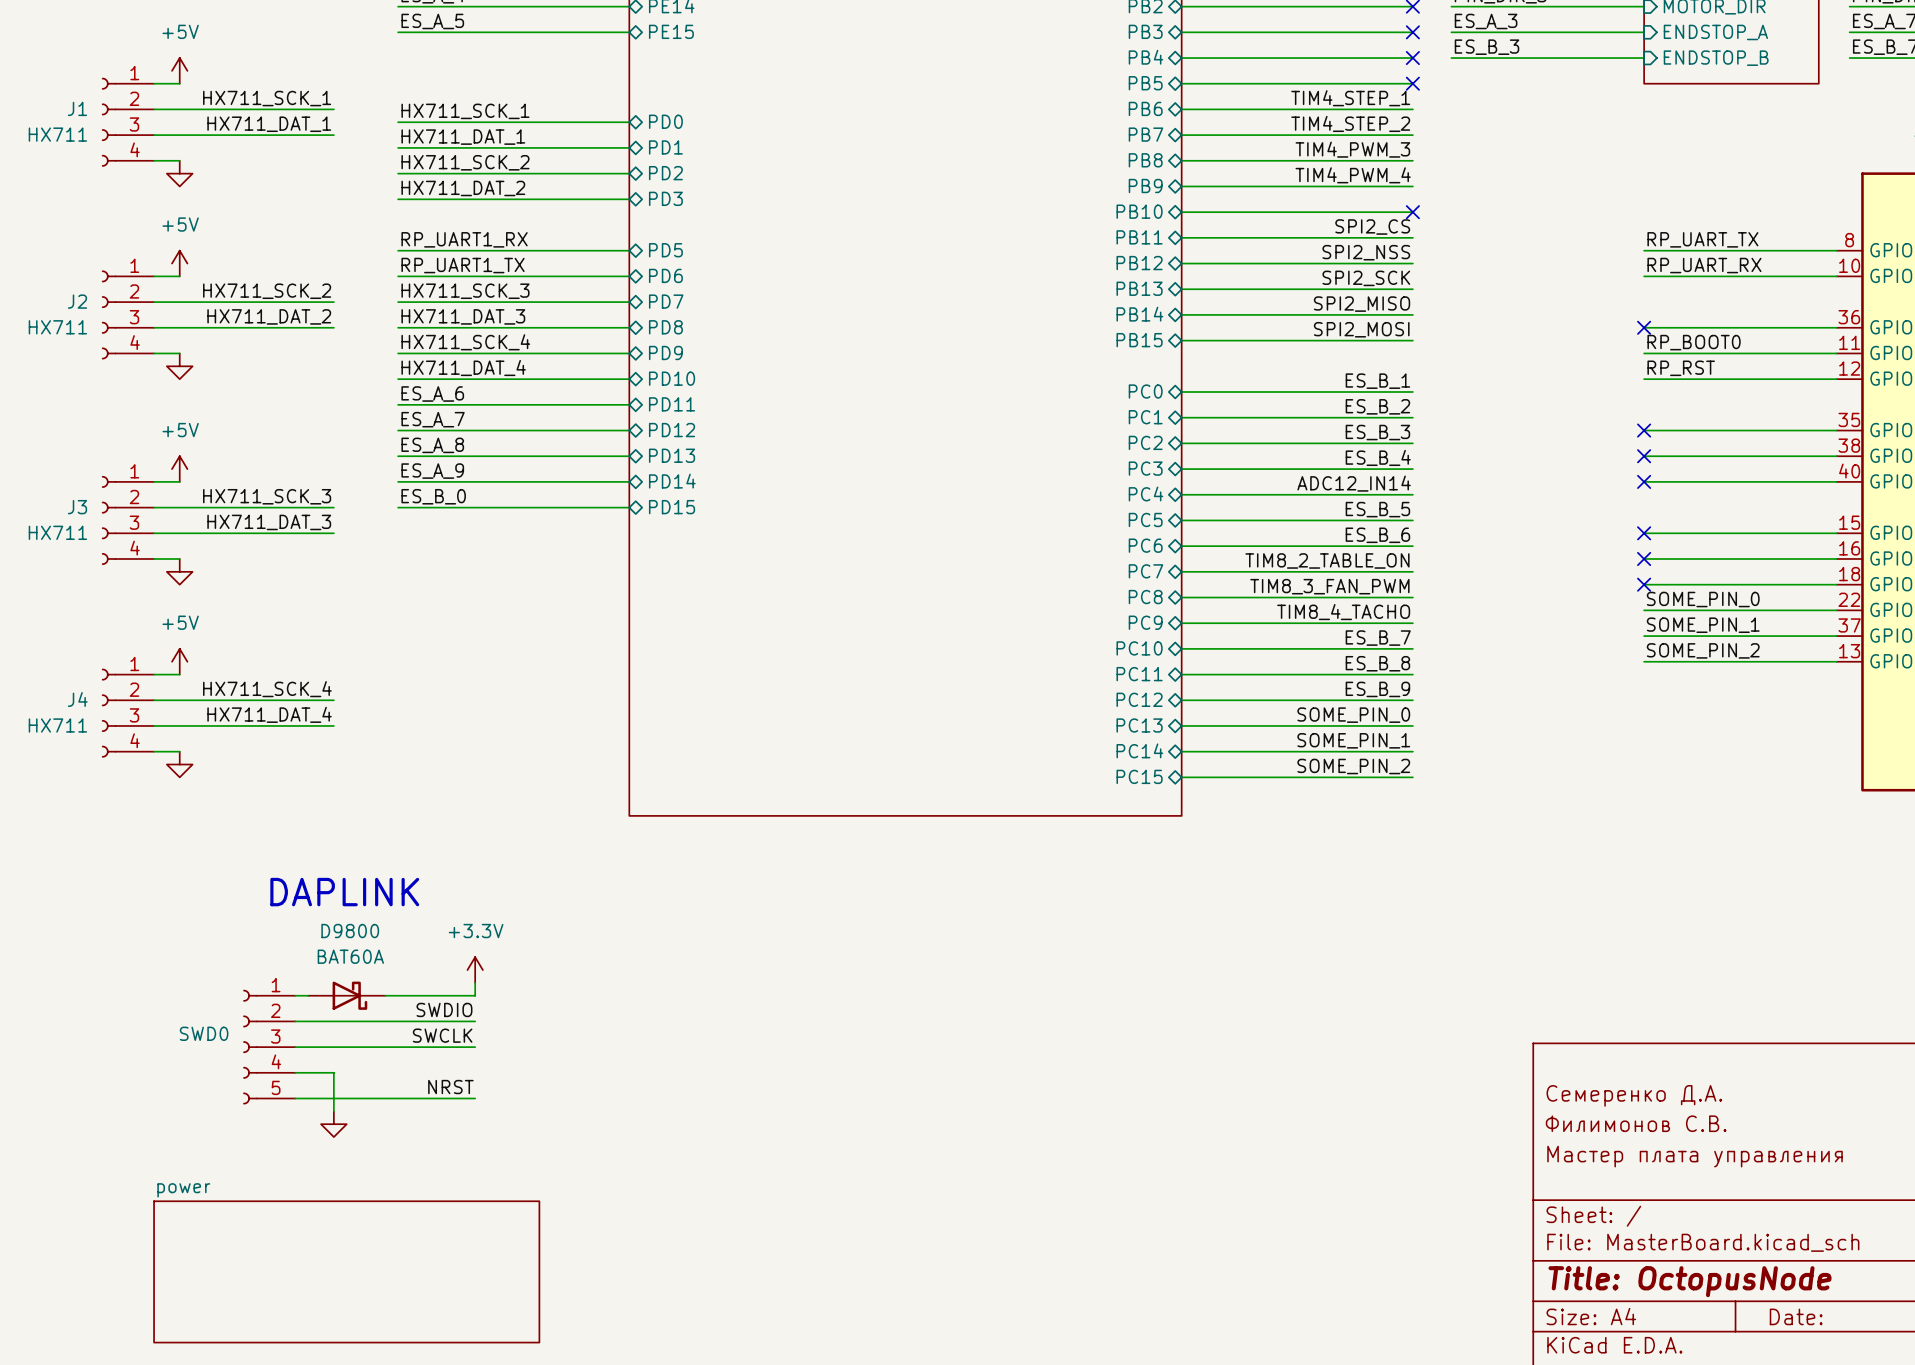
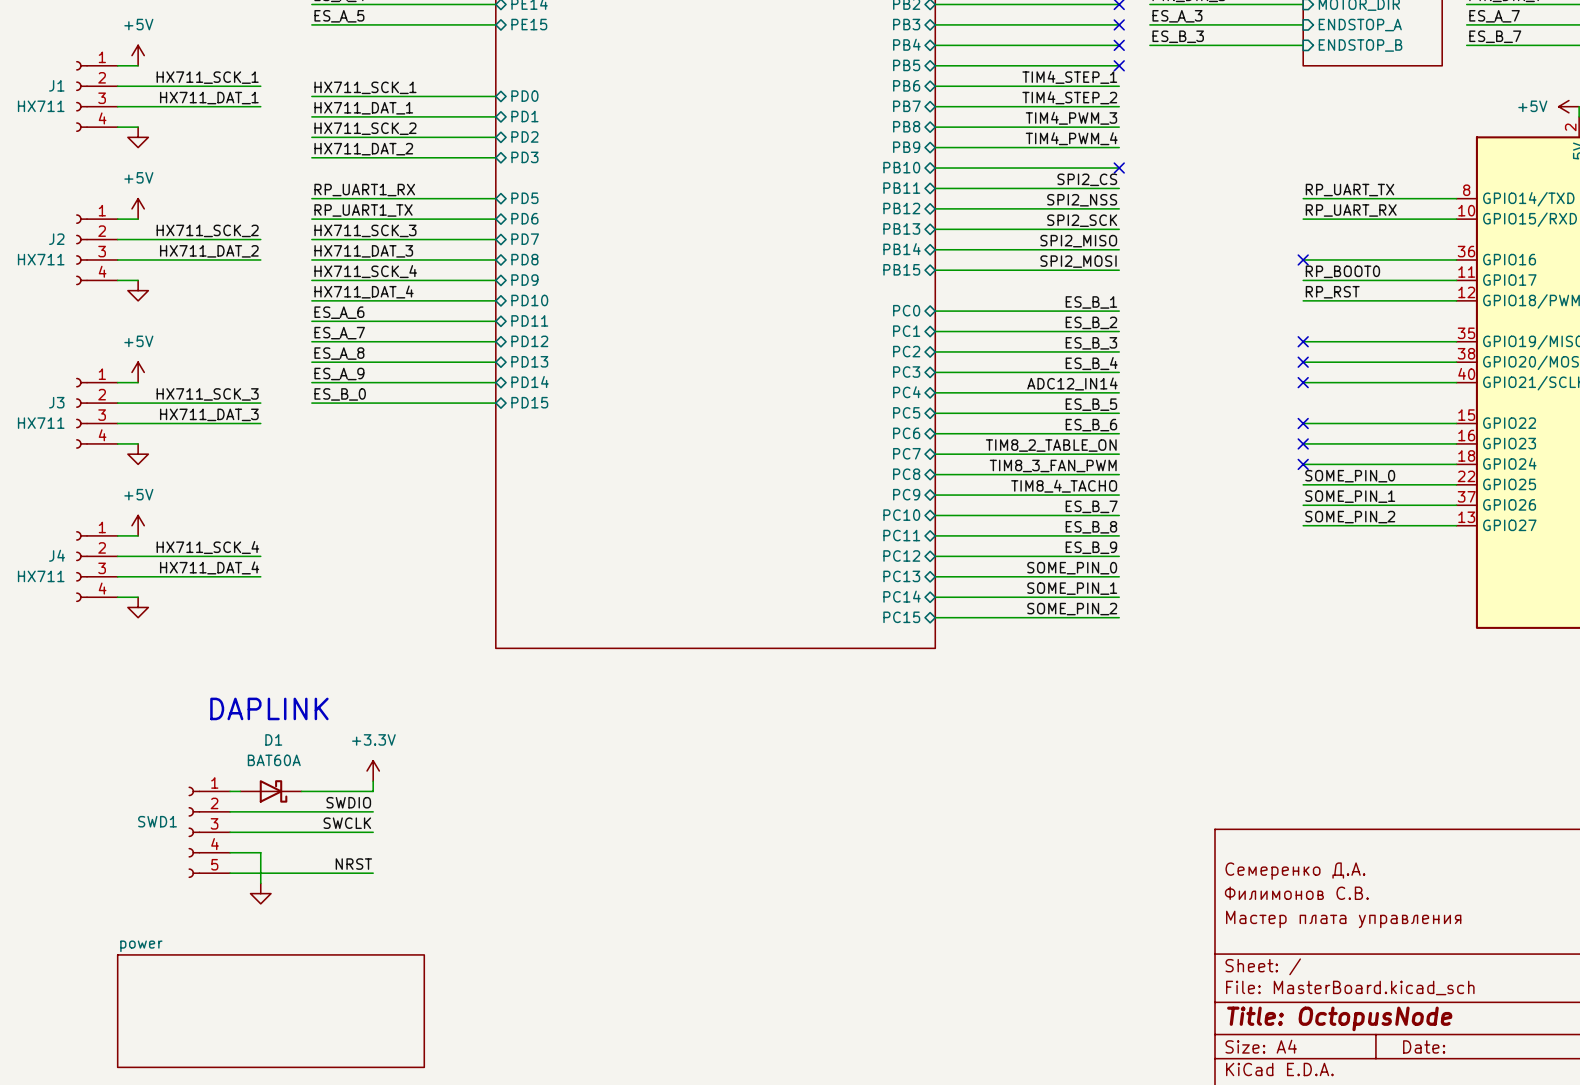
D9800 name: D9800 (350, 931) -> D1 (273, 739)
SWD0 name: SWD0 (204, 1033) -> SWD1 (157, 821)

